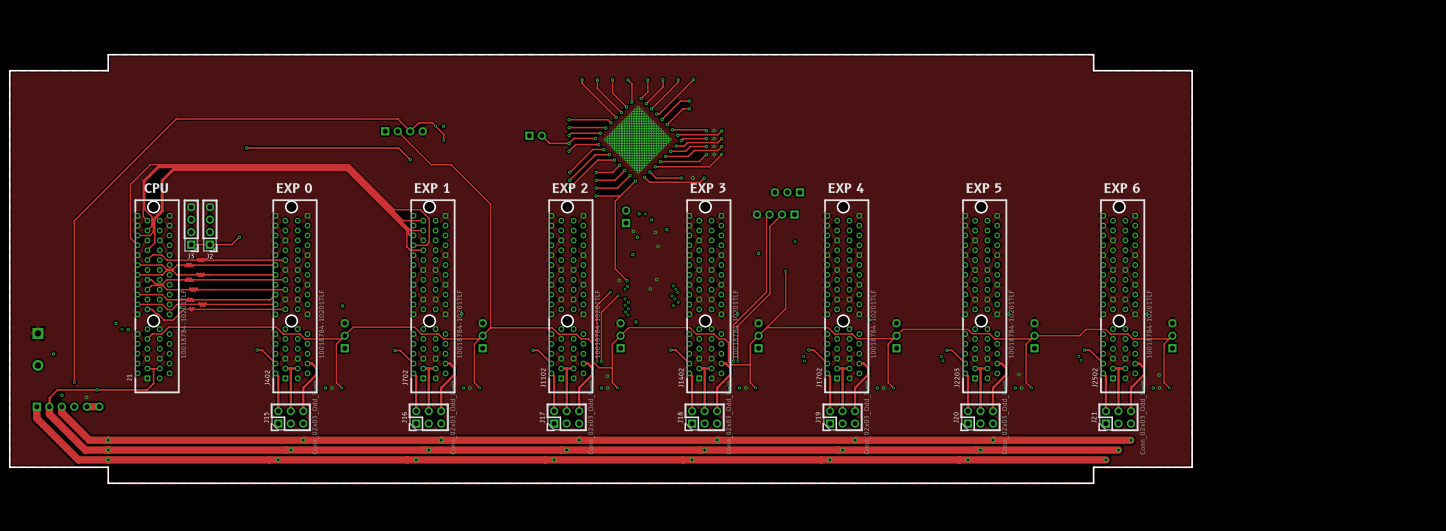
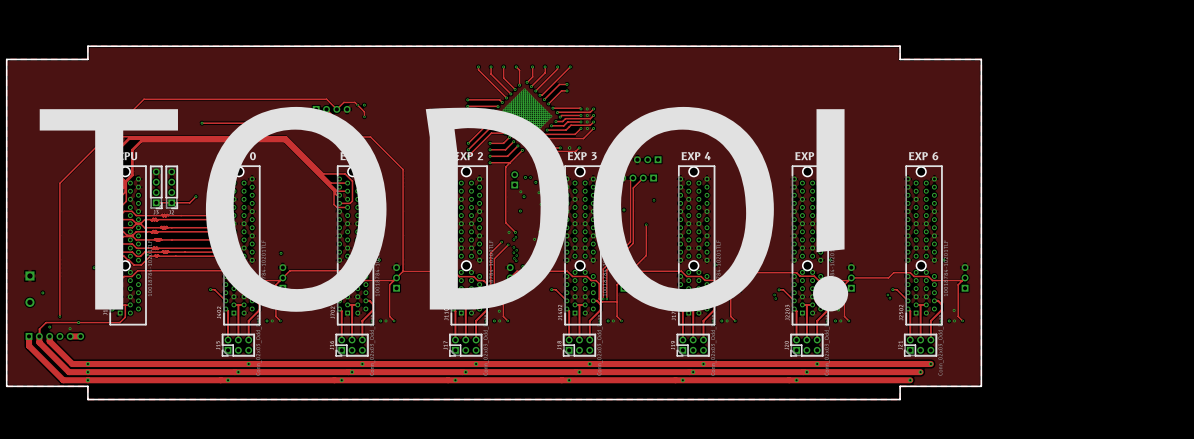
text: none -> TODO! (443, 209)

